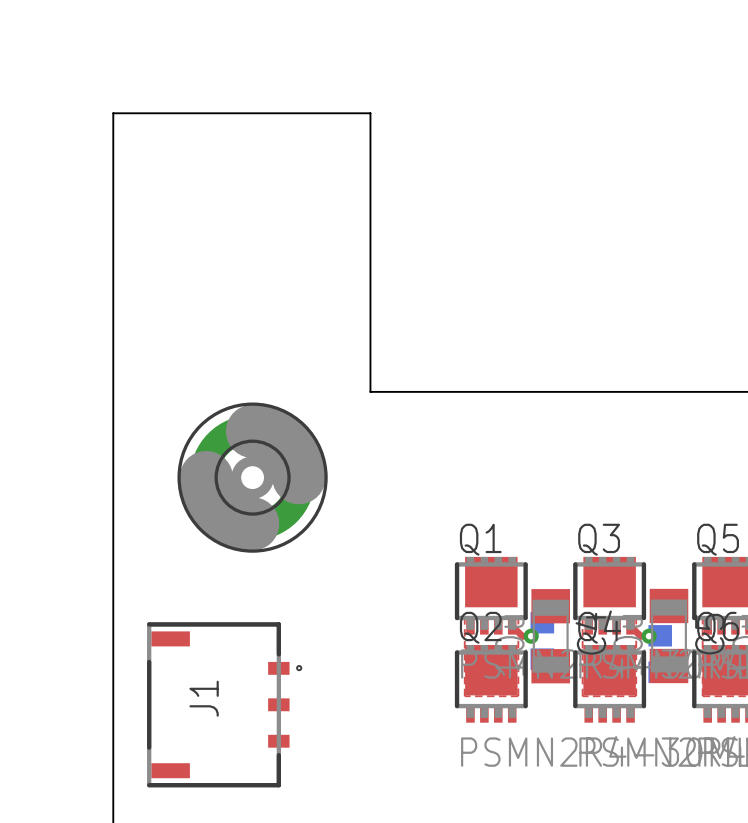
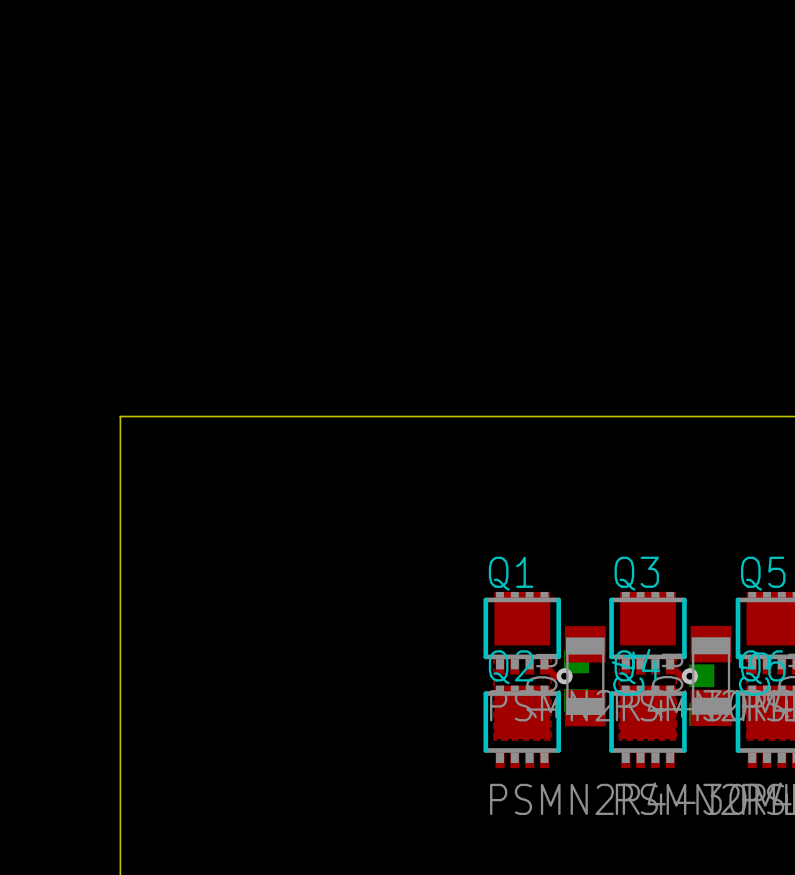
board edge: (113, 391) (113, 113) (370, 113) (370, 391) -> (120, 416) (393, 416)
part: (252, 477) -> none
J1: (224, 704) -> none

